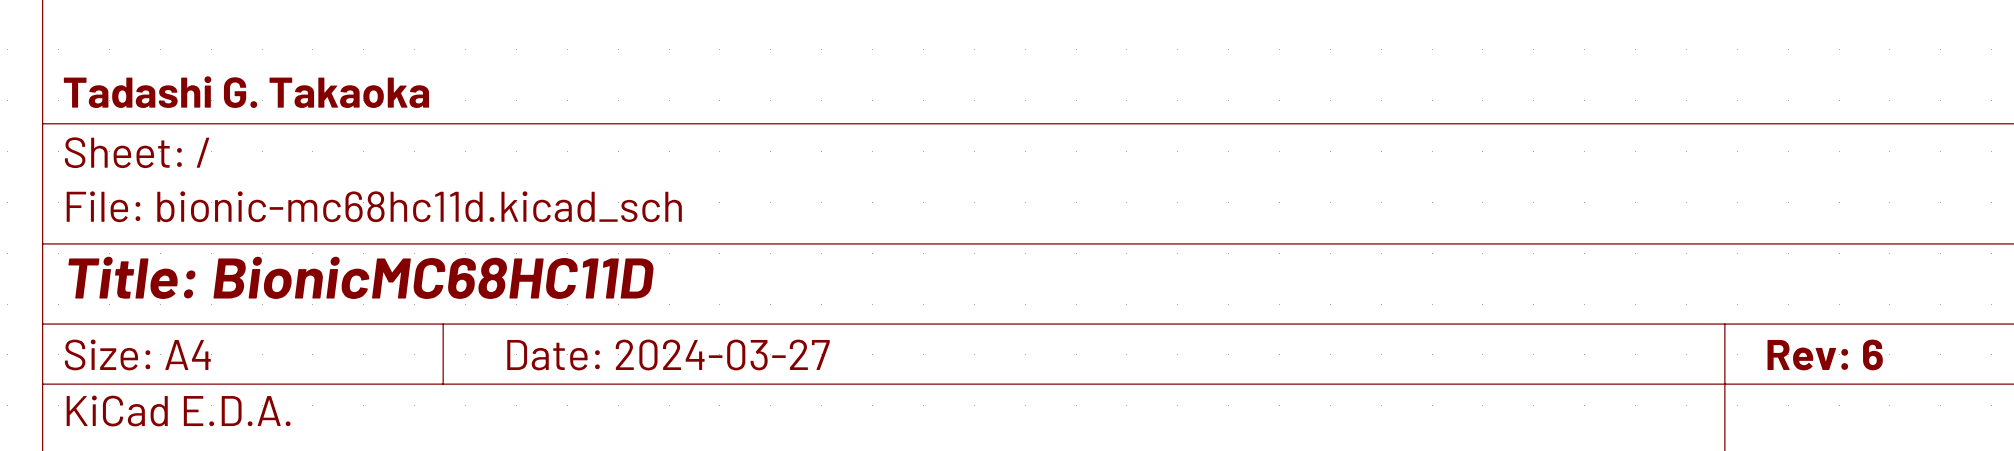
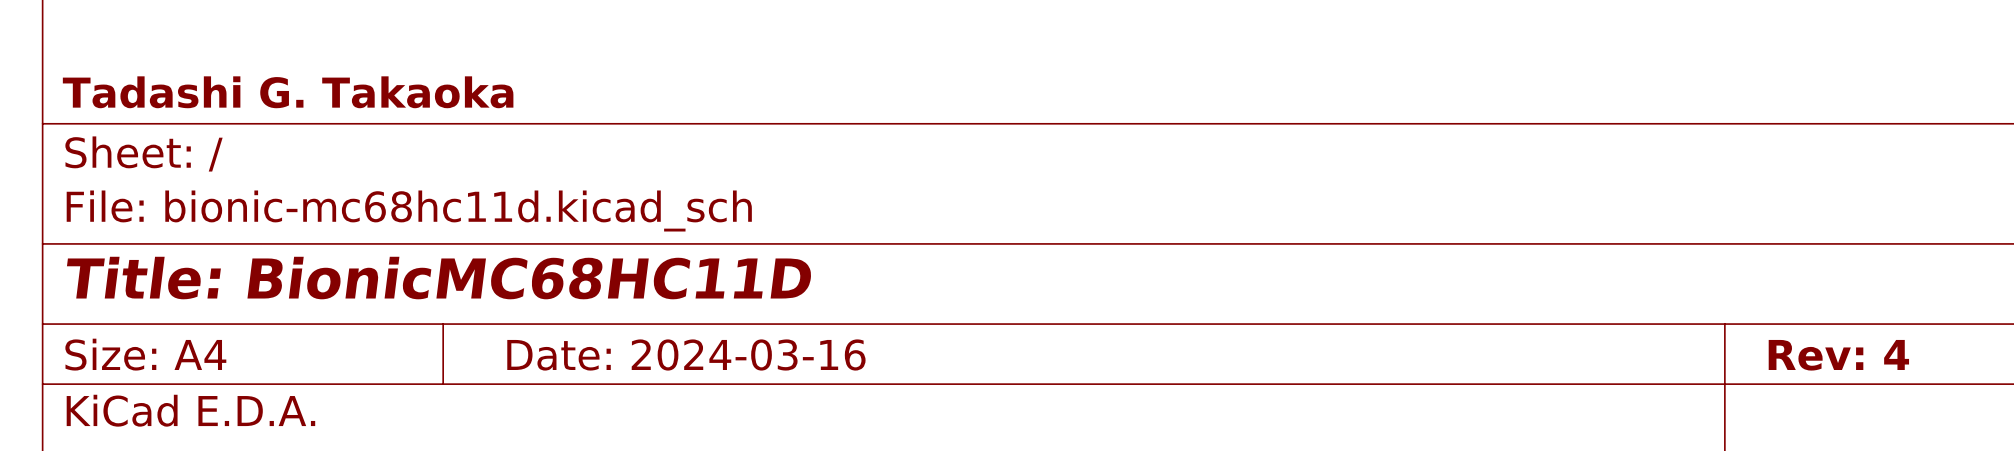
title block: Date: 2024-03-27 (668, 354) -> Date: 2024-03-16 (686, 354)
title block: Rev: 6 (1825, 354) -> Rev: 4 (1838, 355)

